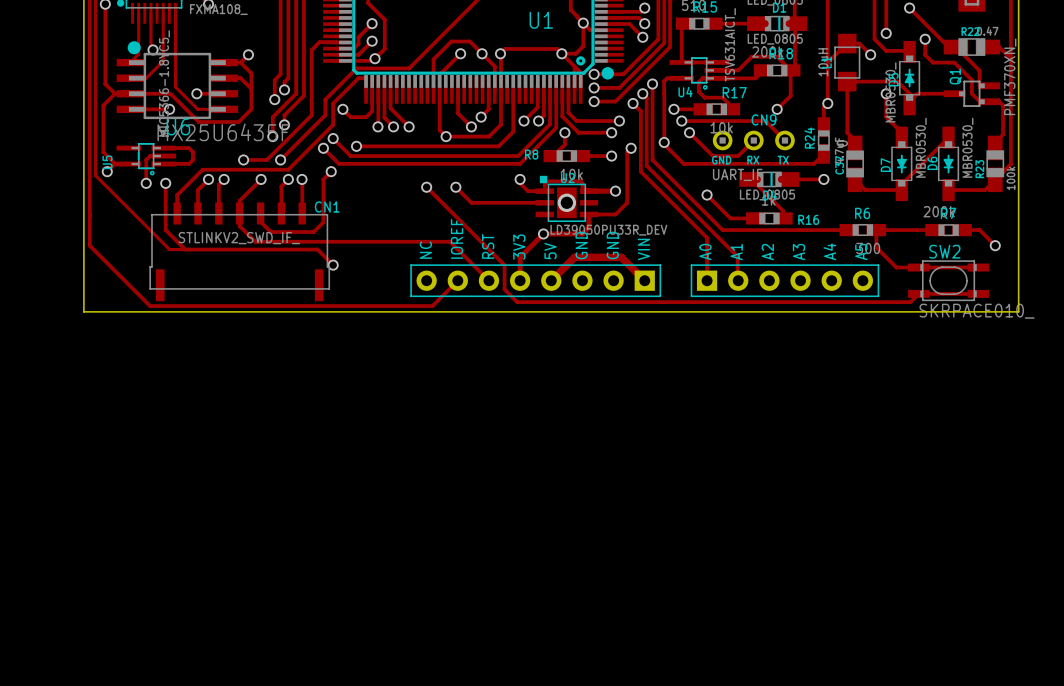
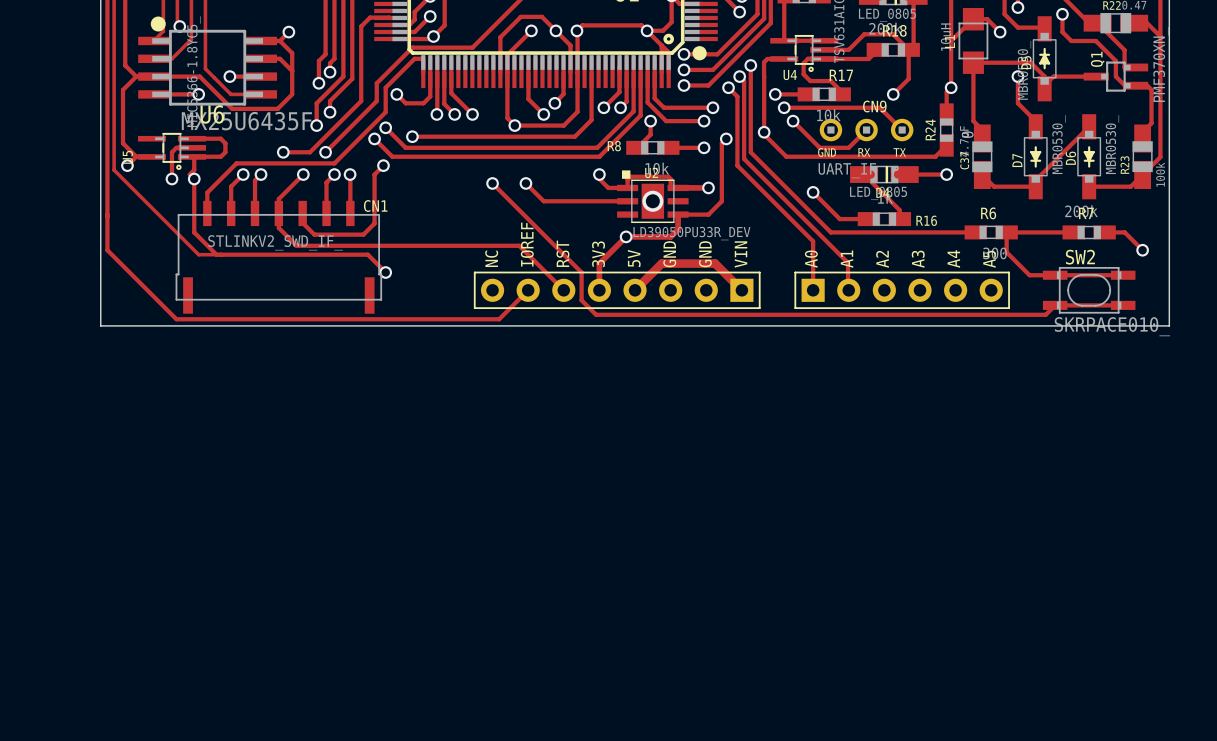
track: none -> (192, 156) (194, 158) (194, 170) (189, 174) (194, 179)

